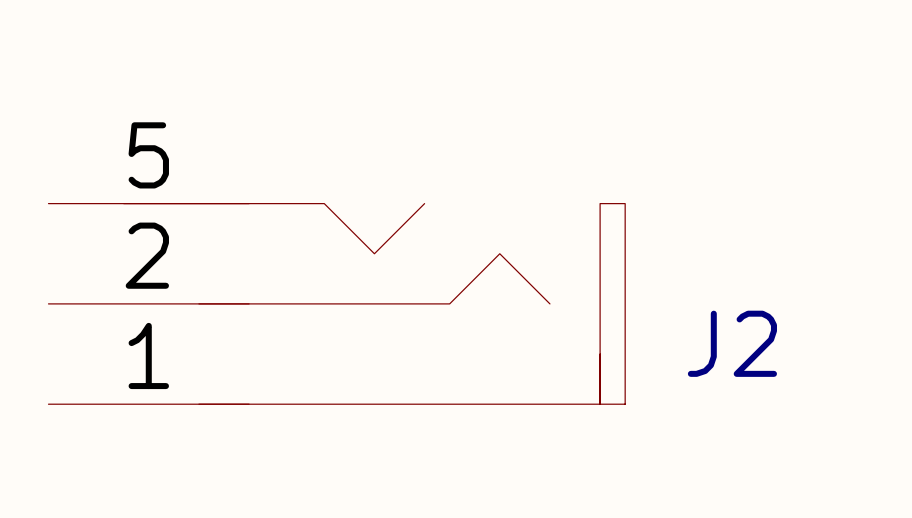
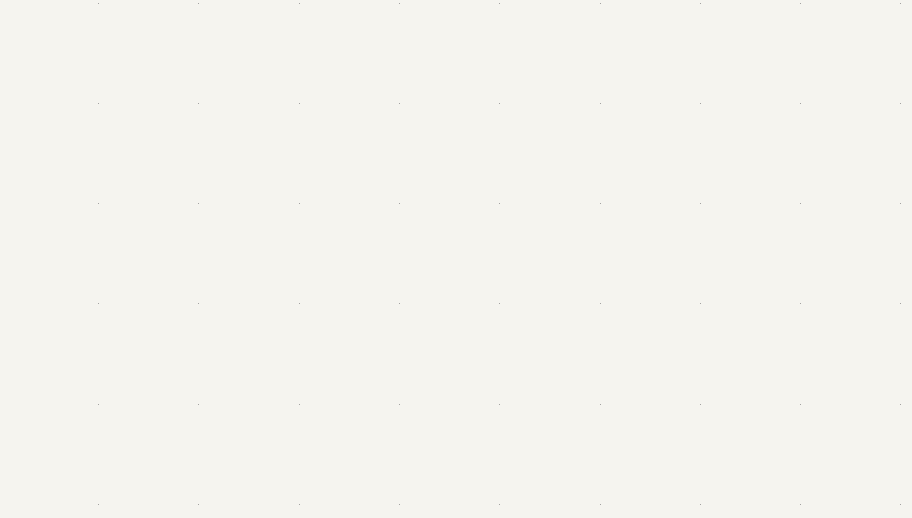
J2: (336, 303) -> none

